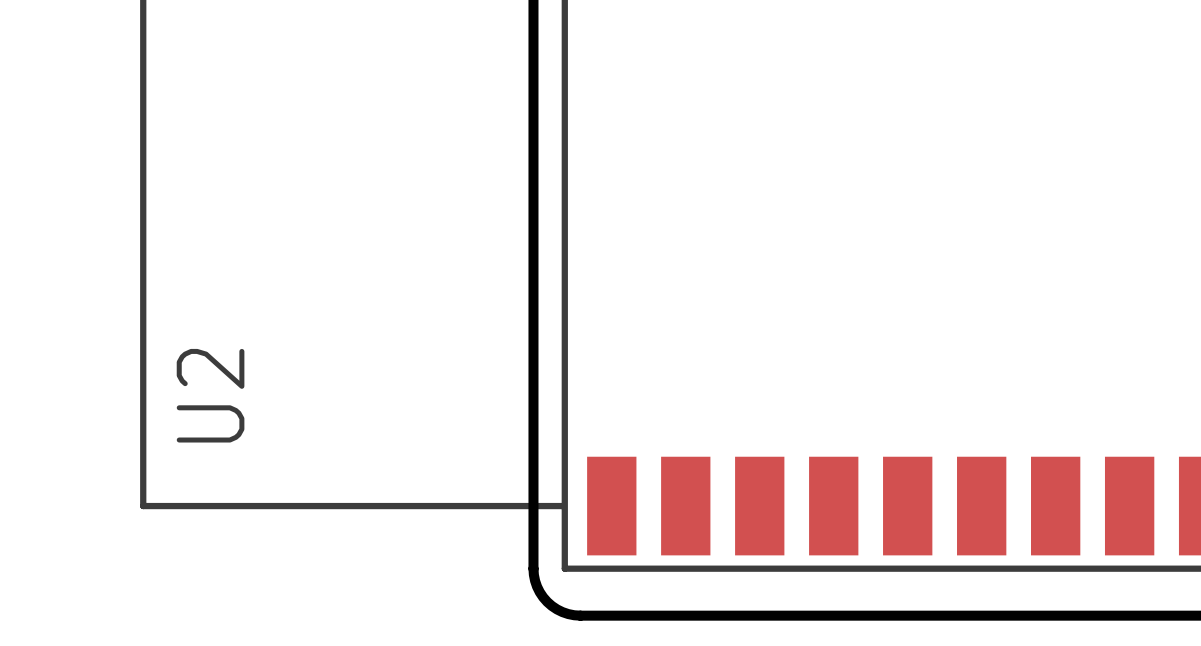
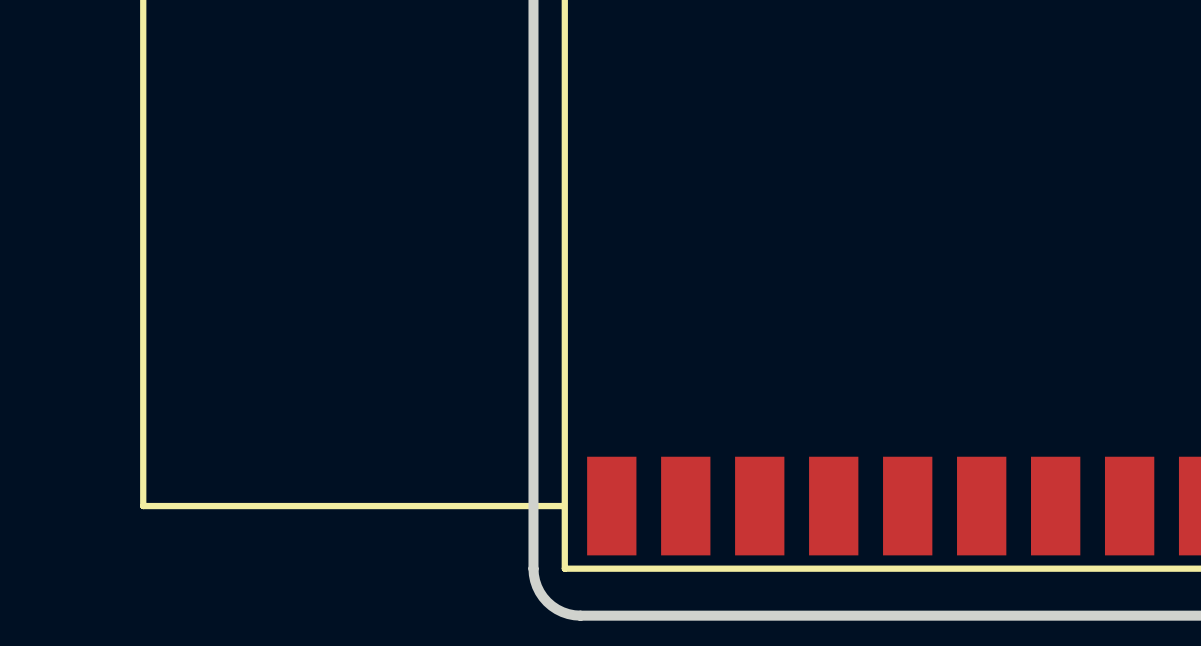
U2 name: U2 (210, 395) -> none

